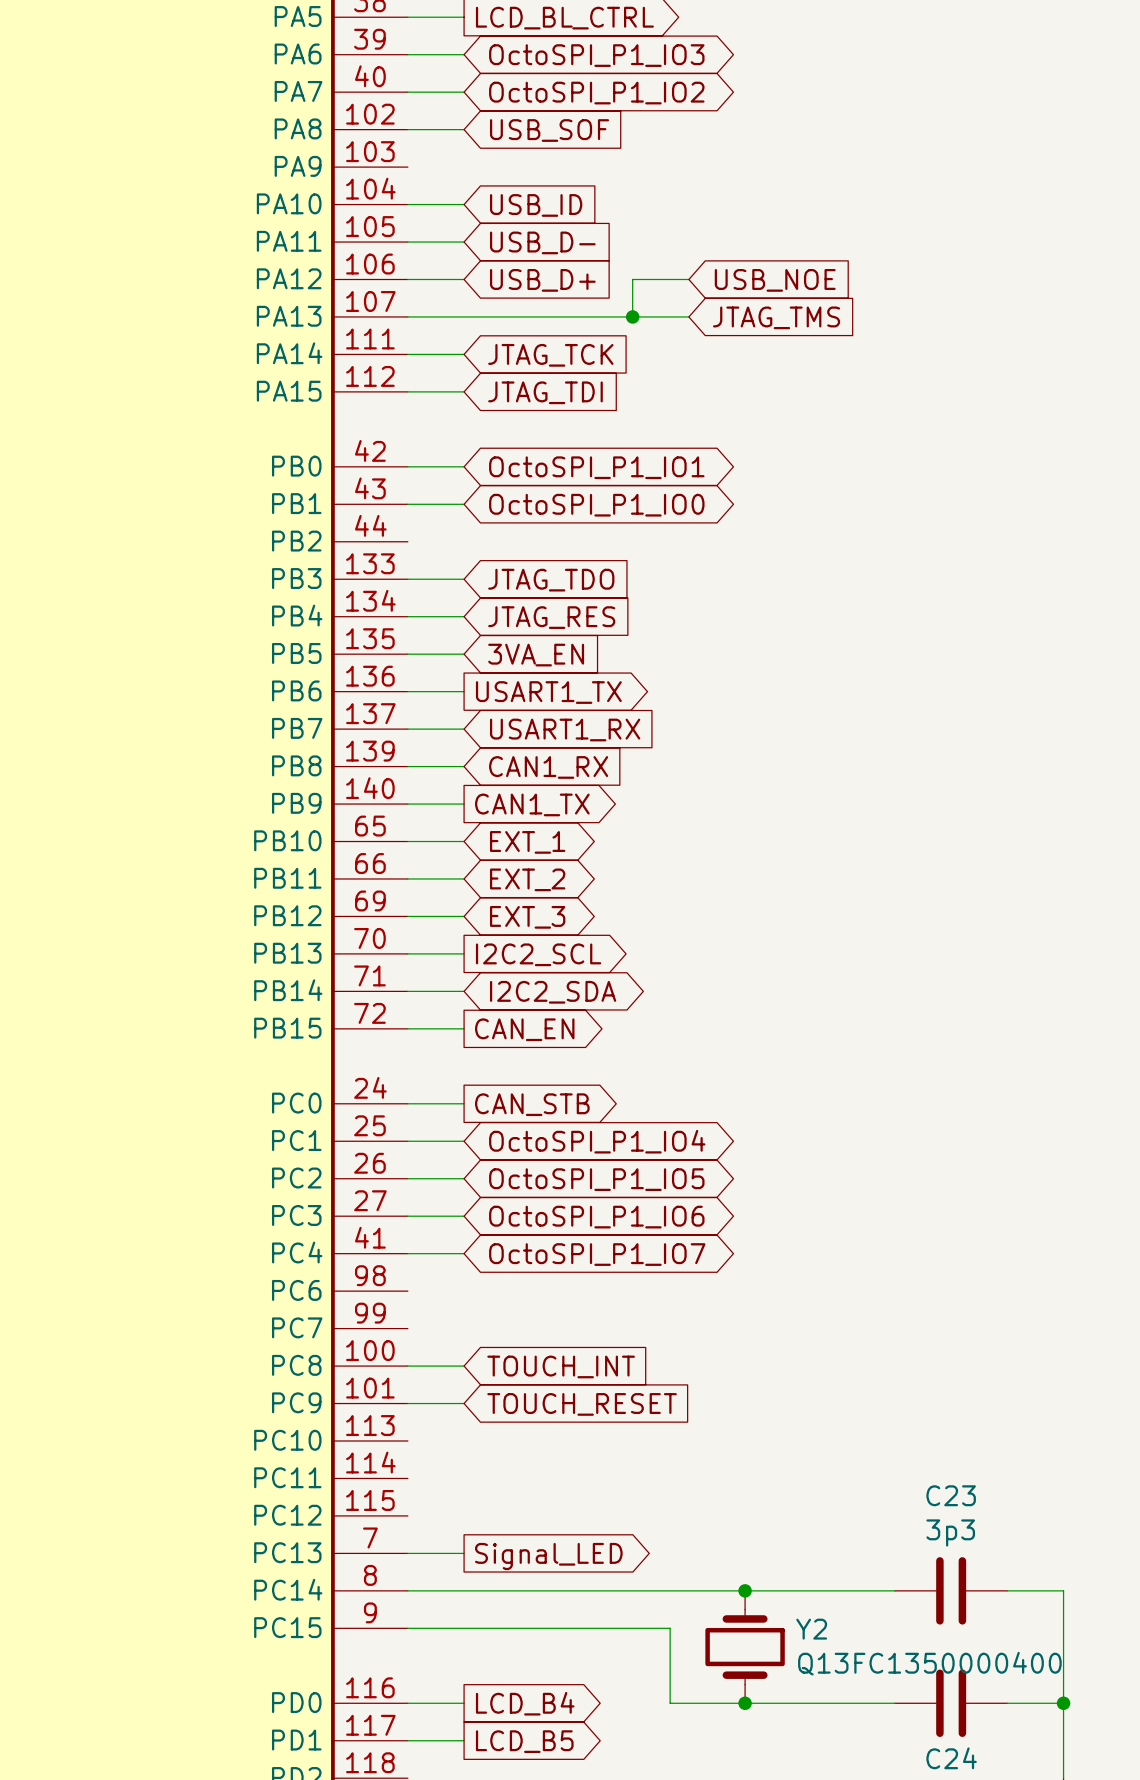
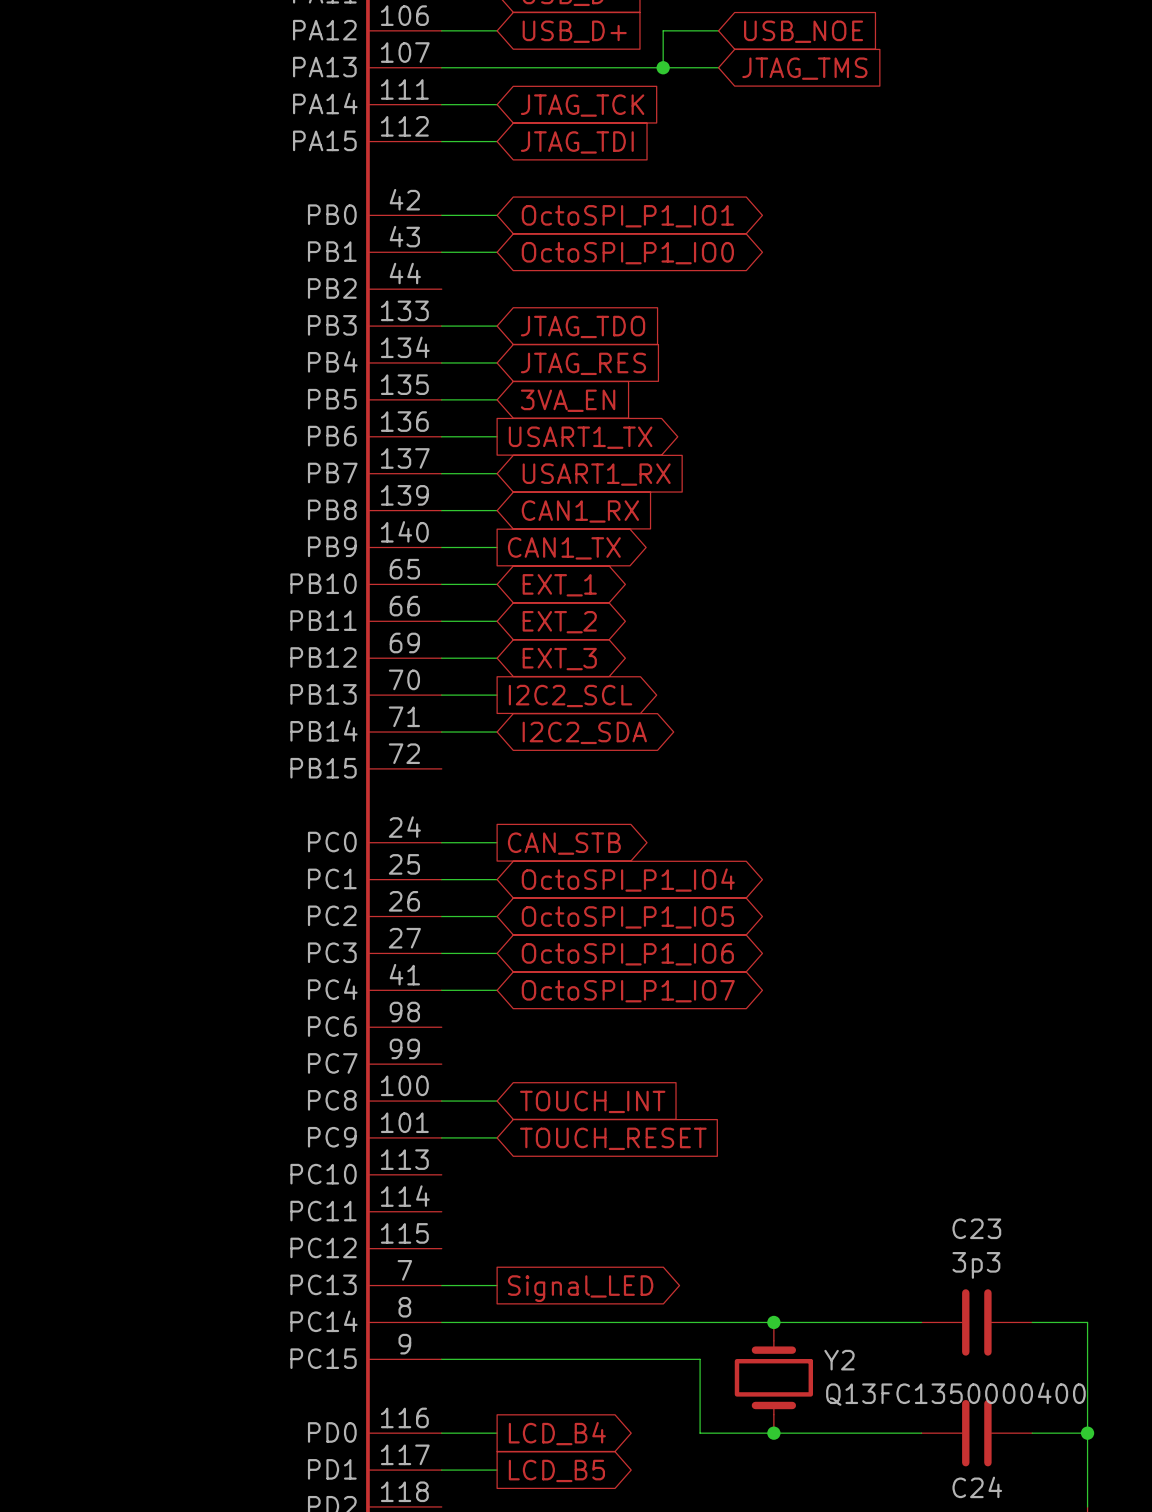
wire: (407, 1028) (464, 1028) -> none
global label: CAN_EN (524, 1029) -> none

